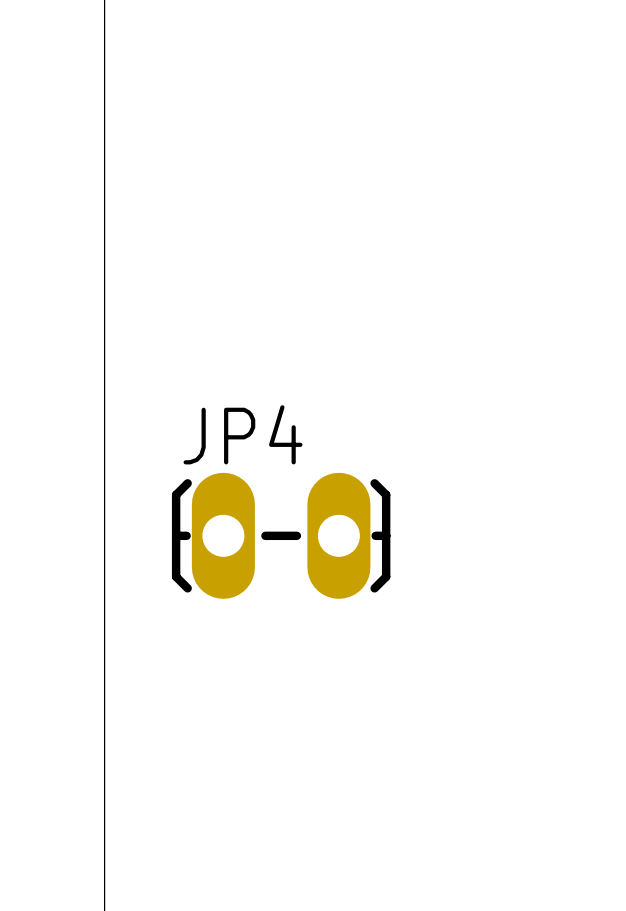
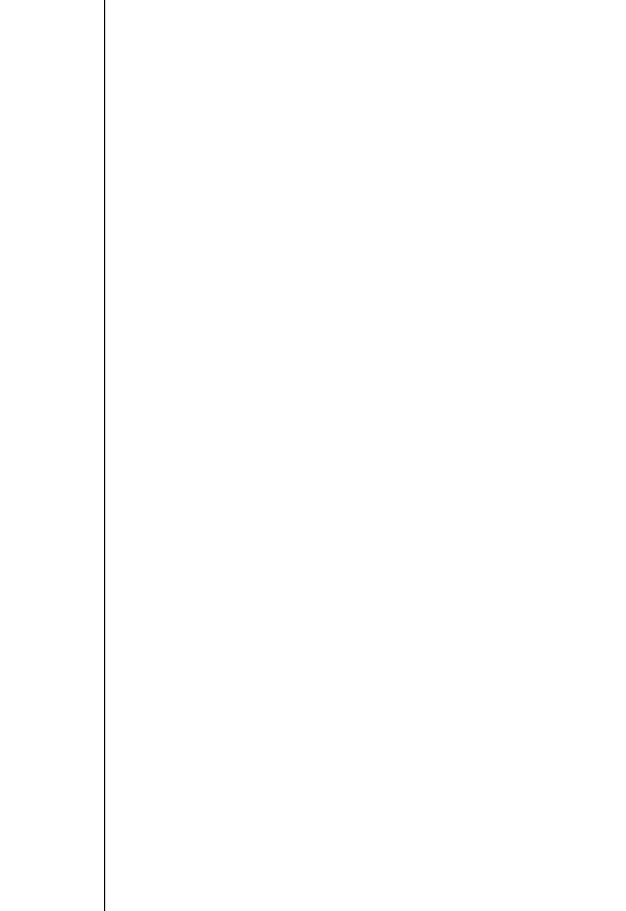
JP4: (281, 535) -> none

